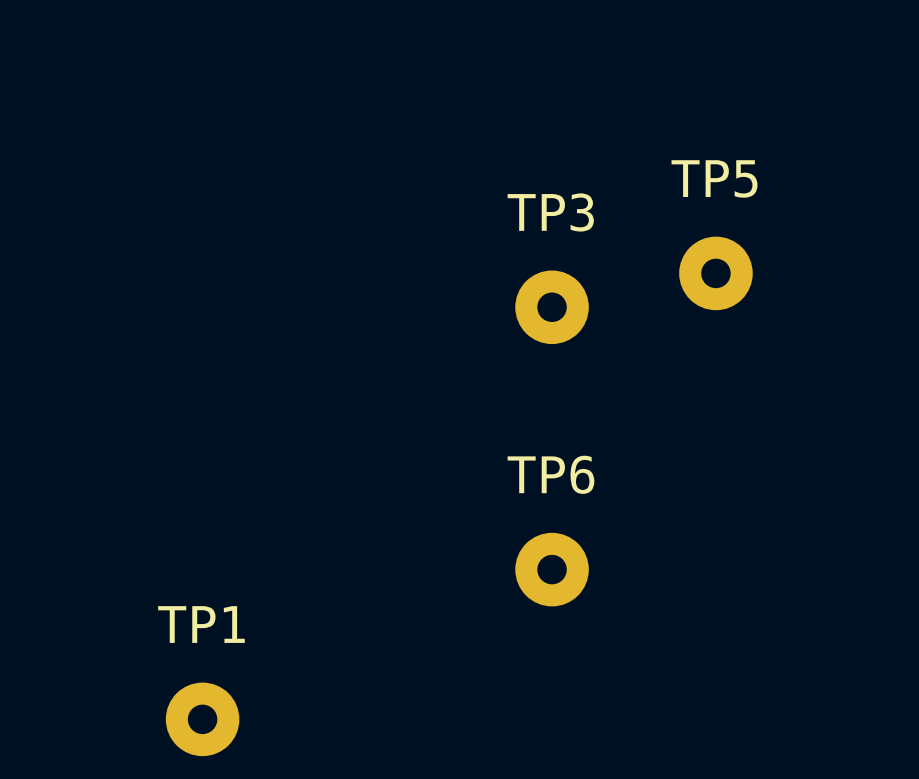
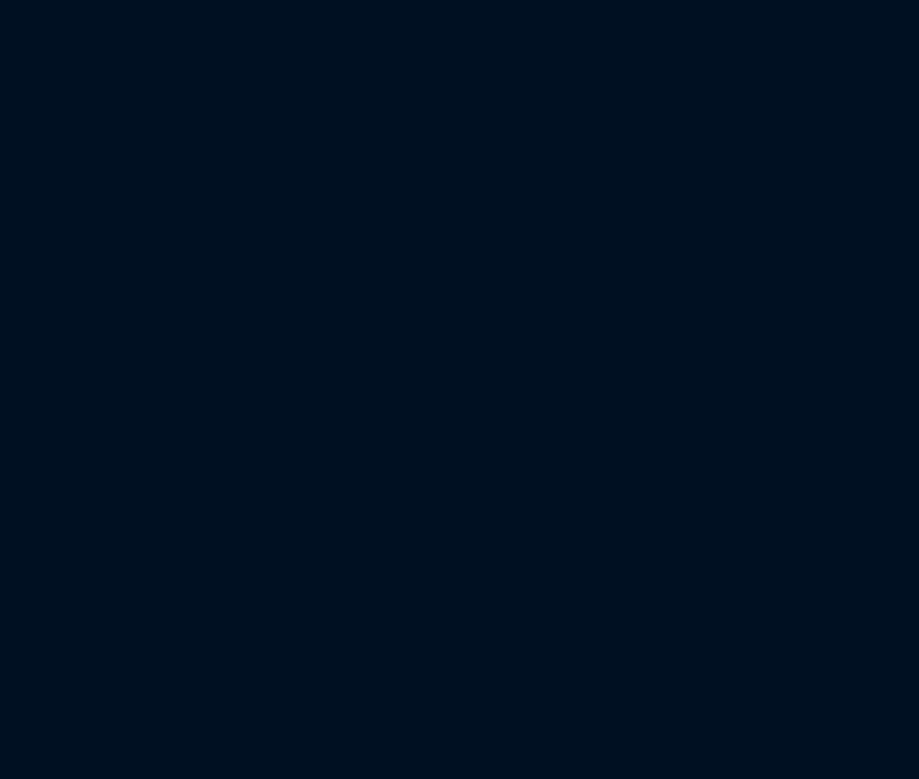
TP5: (715, 273) -> none
TP3: (552, 307) -> none
TP6: (552, 569) -> none
TP1: (202, 719) -> none

